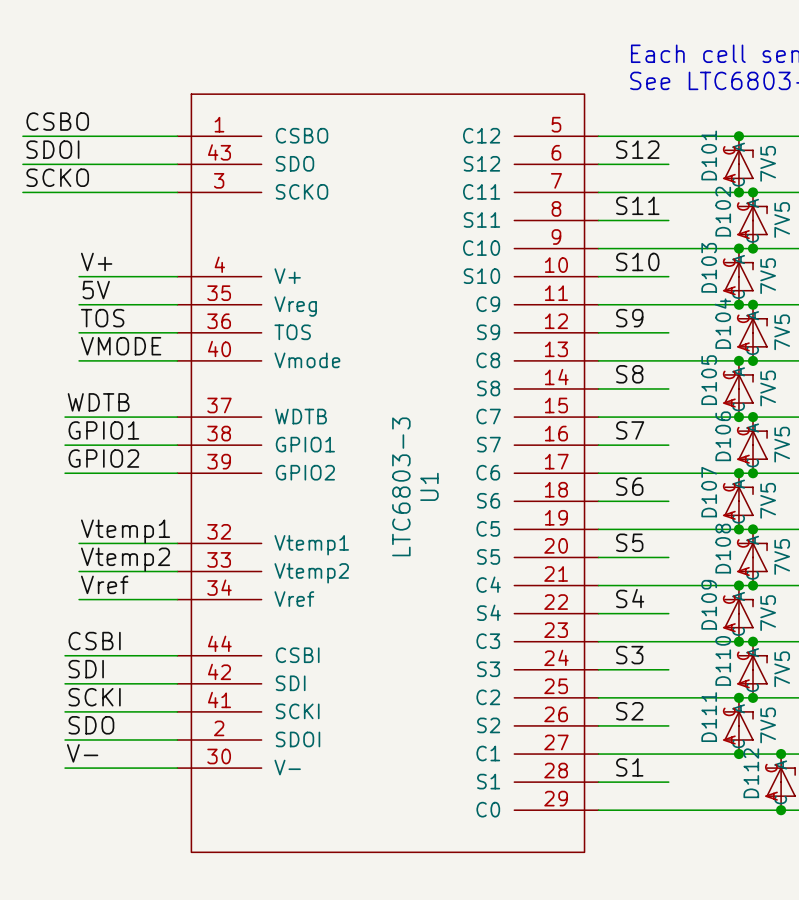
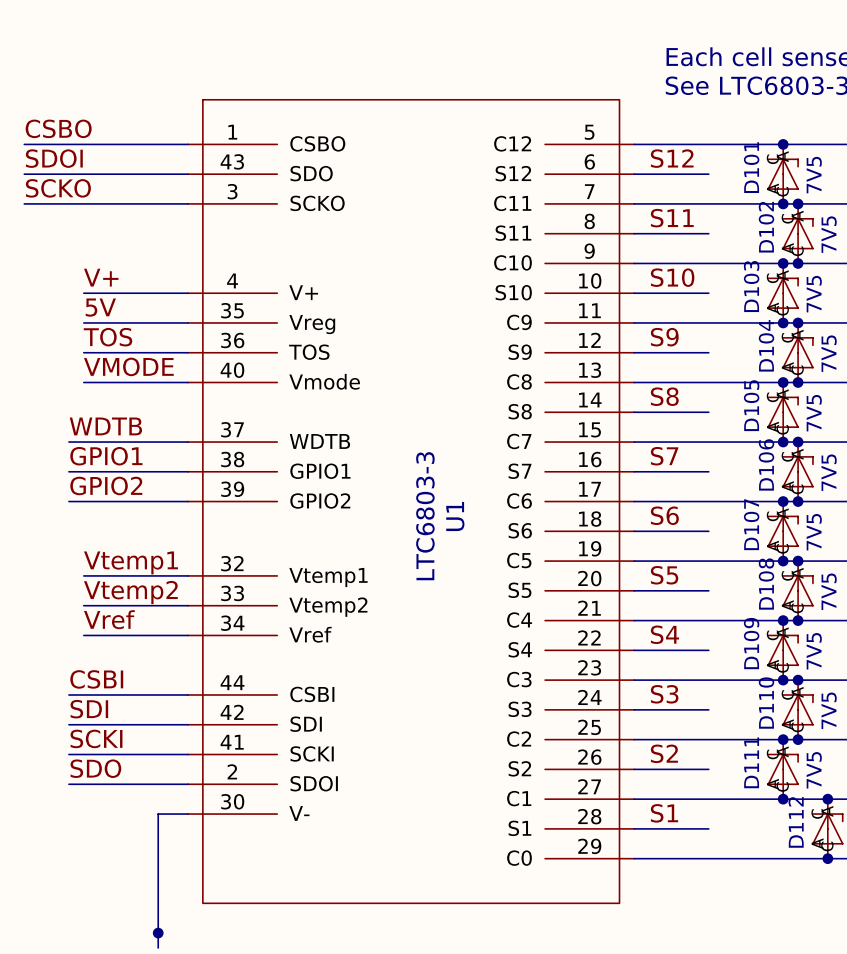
label: V- (82, 753) -> none
wire: (65, 768) (149, 768) -> (158, 947) (158, 814)
junction: none -> (158, 933)

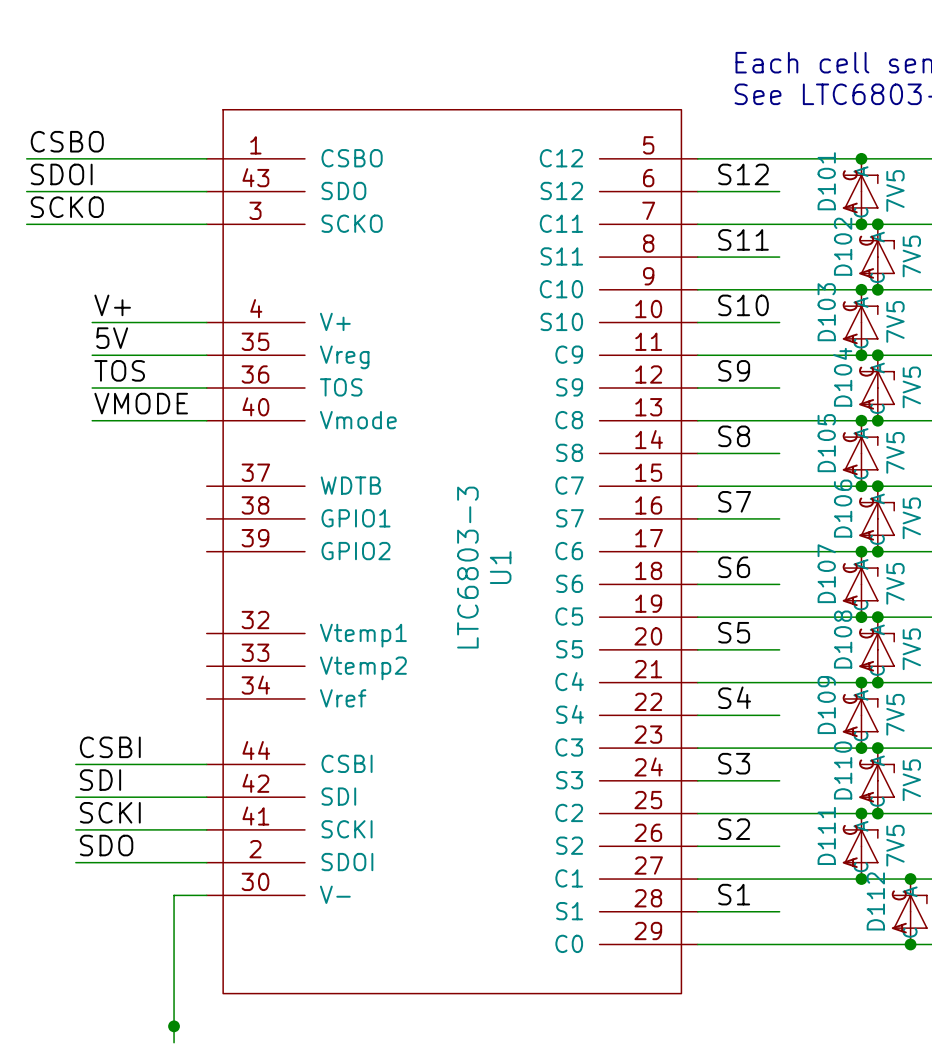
label: WDTB (105, 426) -> none
wire: (68, 442) (187, 442) -> none
label: GPIO1 (106, 456) -> none
wire: (68, 471) (187, 471) -> none
label: GPIO2 (106, 485) -> none
wire: (68, 501) (187, 501) -> none
label: Vtemp1 (130, 562) -> none
wire: (83, 575) (187, 575) -> none
label: Vtemp2 (130, 592) -> none
wire: (83, 605) (187, 605) -> none
label: Vref (109, 619) -> none
wire: (83, 635) (187, 635) -> none

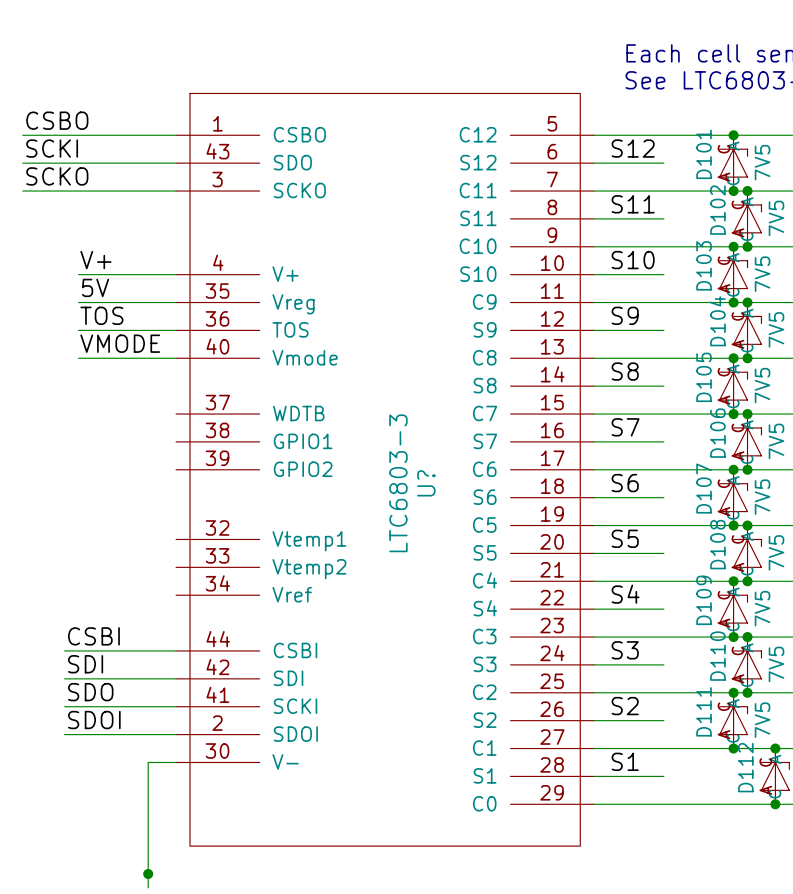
label: SDOI (61, 174) -> SCKI (52, 148)
U1 name: U1 (500, 567) -> U? (426, 483)
label: SCKI (110, 812) -> SDO (90, 692)
label: SDO (106, 845) -> SDOI (94, 720)

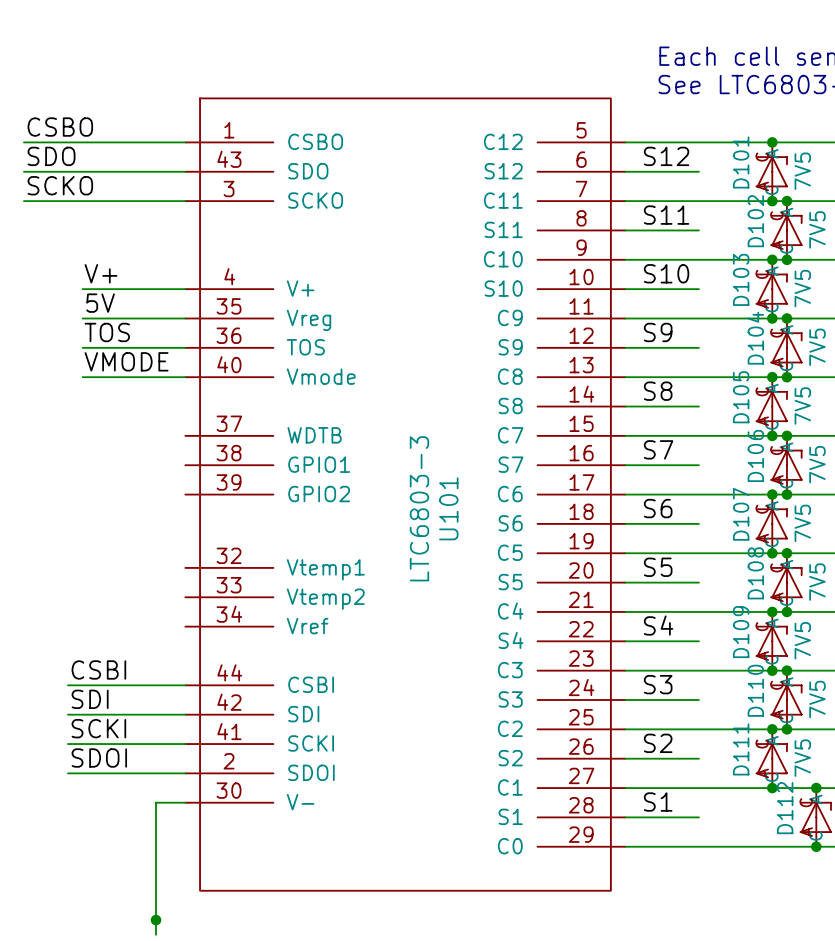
label: SCKI (52, 148) -> SDO (51, 156)
U? name: U? (426, 483) -> U101 (448, 508)
label: SDO (90, 692) -> SCKI (98, 728)

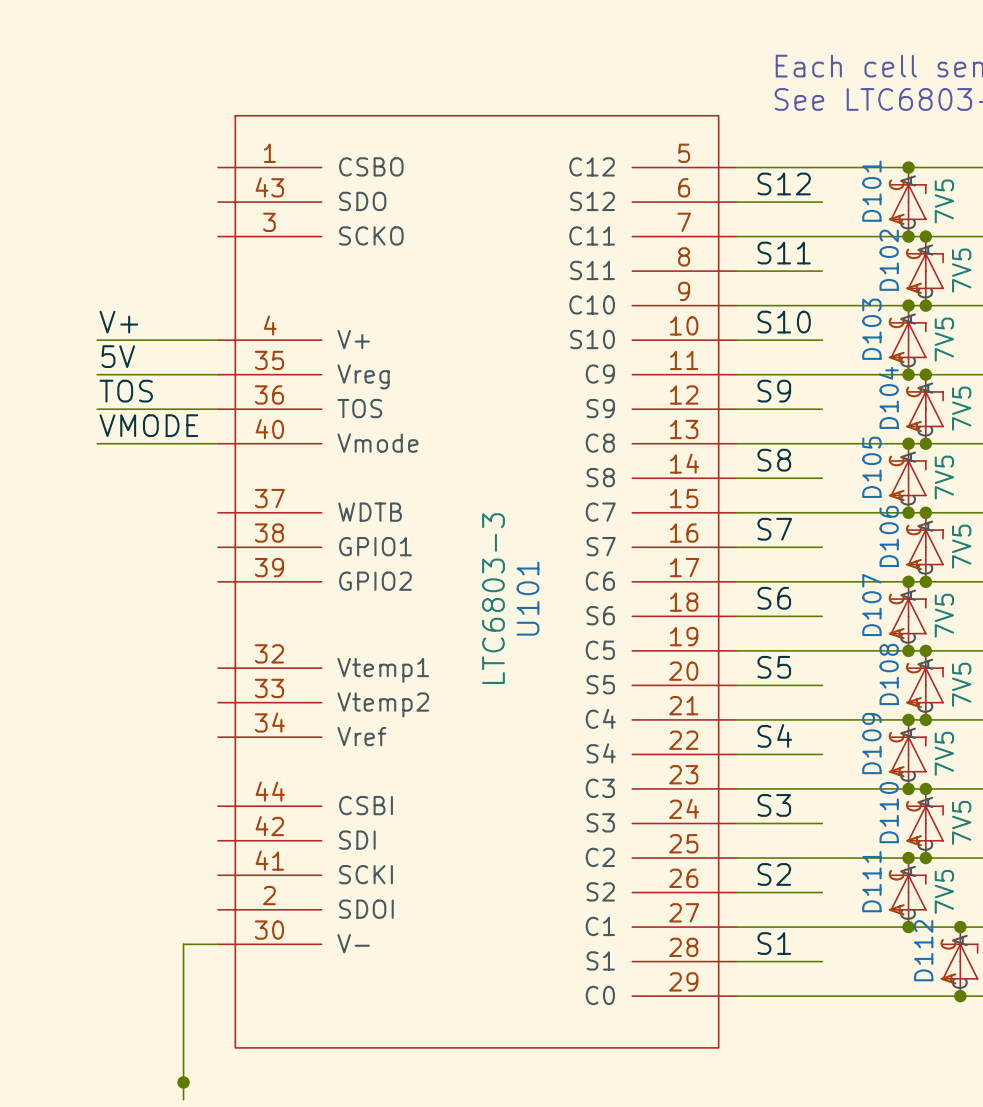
label: CSBO (60, 127) -> none
wire: (23, 142) (185, 142) -> none
label: SDO (51, 156) -> none
wire: (23, 171) (185, 171) -> none
label: SCKO (60, 185) -> none
wire: (23, 201) (185, 201) -> none
label: CSBI (98, 669) -> none
wire: (67, 685) (185, 685) -> none
label: SDI (90, 699) -> none
wire: (67, 714) (185, 714) -> none
label: SCKI (98, 728) -> none
wire: (67, 744) (185, 744) -> none
label: SDOI (99, 758) -> none
wire: (67, 773) (185, 773) -> none

